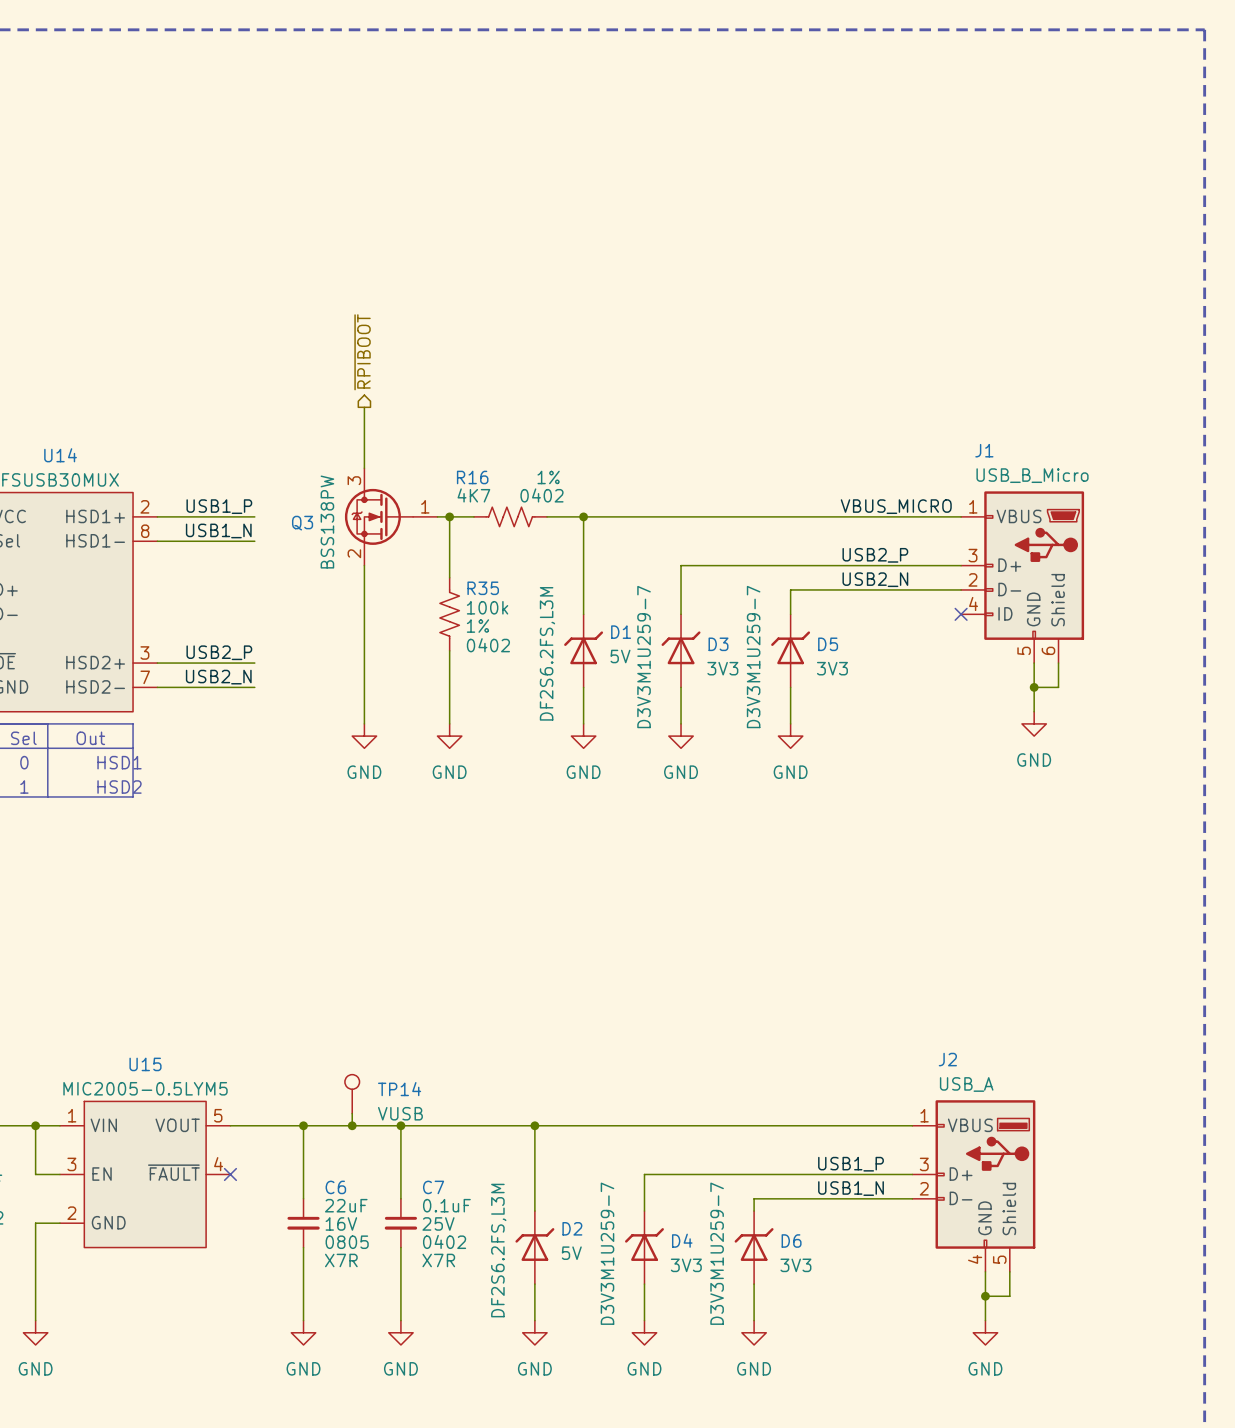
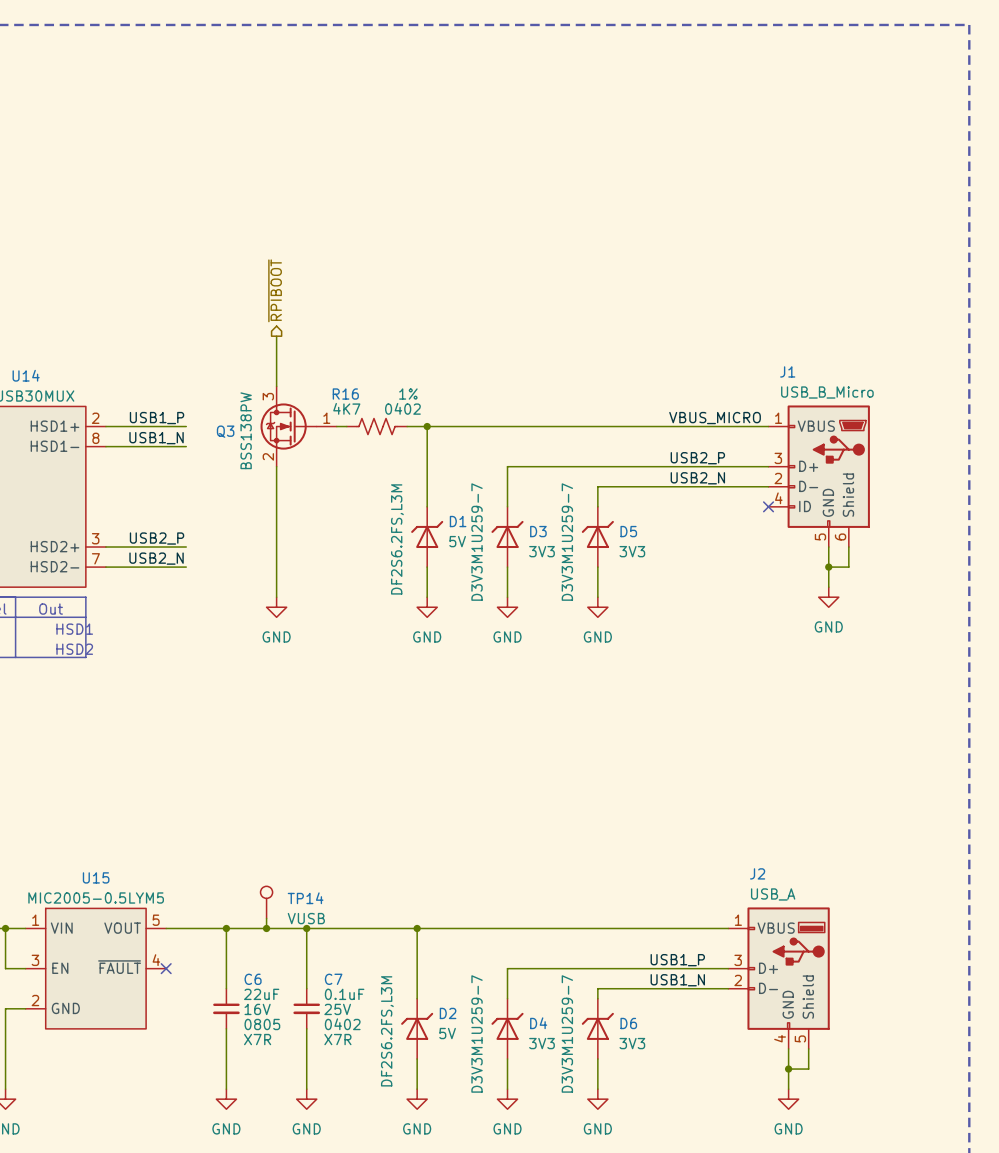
junction: (449, 516) -> none
wire: (474, 516) (449, 516) (449, 577) -> none
R16 position: (510, 516) -> (377, 426)
wire: none -> (407, 426) (427, 426) (427, 506)
wire: (583, 516) (583, 614) -> none
junction position: (583, 516) -> (427, 426)
wire: (681, 565) (681, 614) -> (537, 466) (507, 466) (507, 506)
wire: (790, 589) (790, 614) -> (627, 486) (597, 486) (597, 506)
R35: 100k (449, 614) -> none
wire: (449, 650) (449, 723) -> none
D1 position: (583, 650) -> (427, 536)
D3 position: (681, 650) -> (507, 536)
D5 position: (790, 650) -> (597, 536)
wire: (583, 687) (583, 723) -> (427, 567) (427, 597)
wire: (681, 687) (681, 723) -> (507, 567) (507, 597)
wire: (790, 687) (790, 723) -> (597, 567) (597, 597)
power symbol: GND (449, 736) -> none
power symbol: none -> GND (427, 607)
power symbol: GND (583, 736) -> none
power symbol: none -> GND (507, 607)
power symbol: GND (681, 736) -> none
power symbol: none -> GND (597, 607)
power symbol: GND (790, 736) -> none

